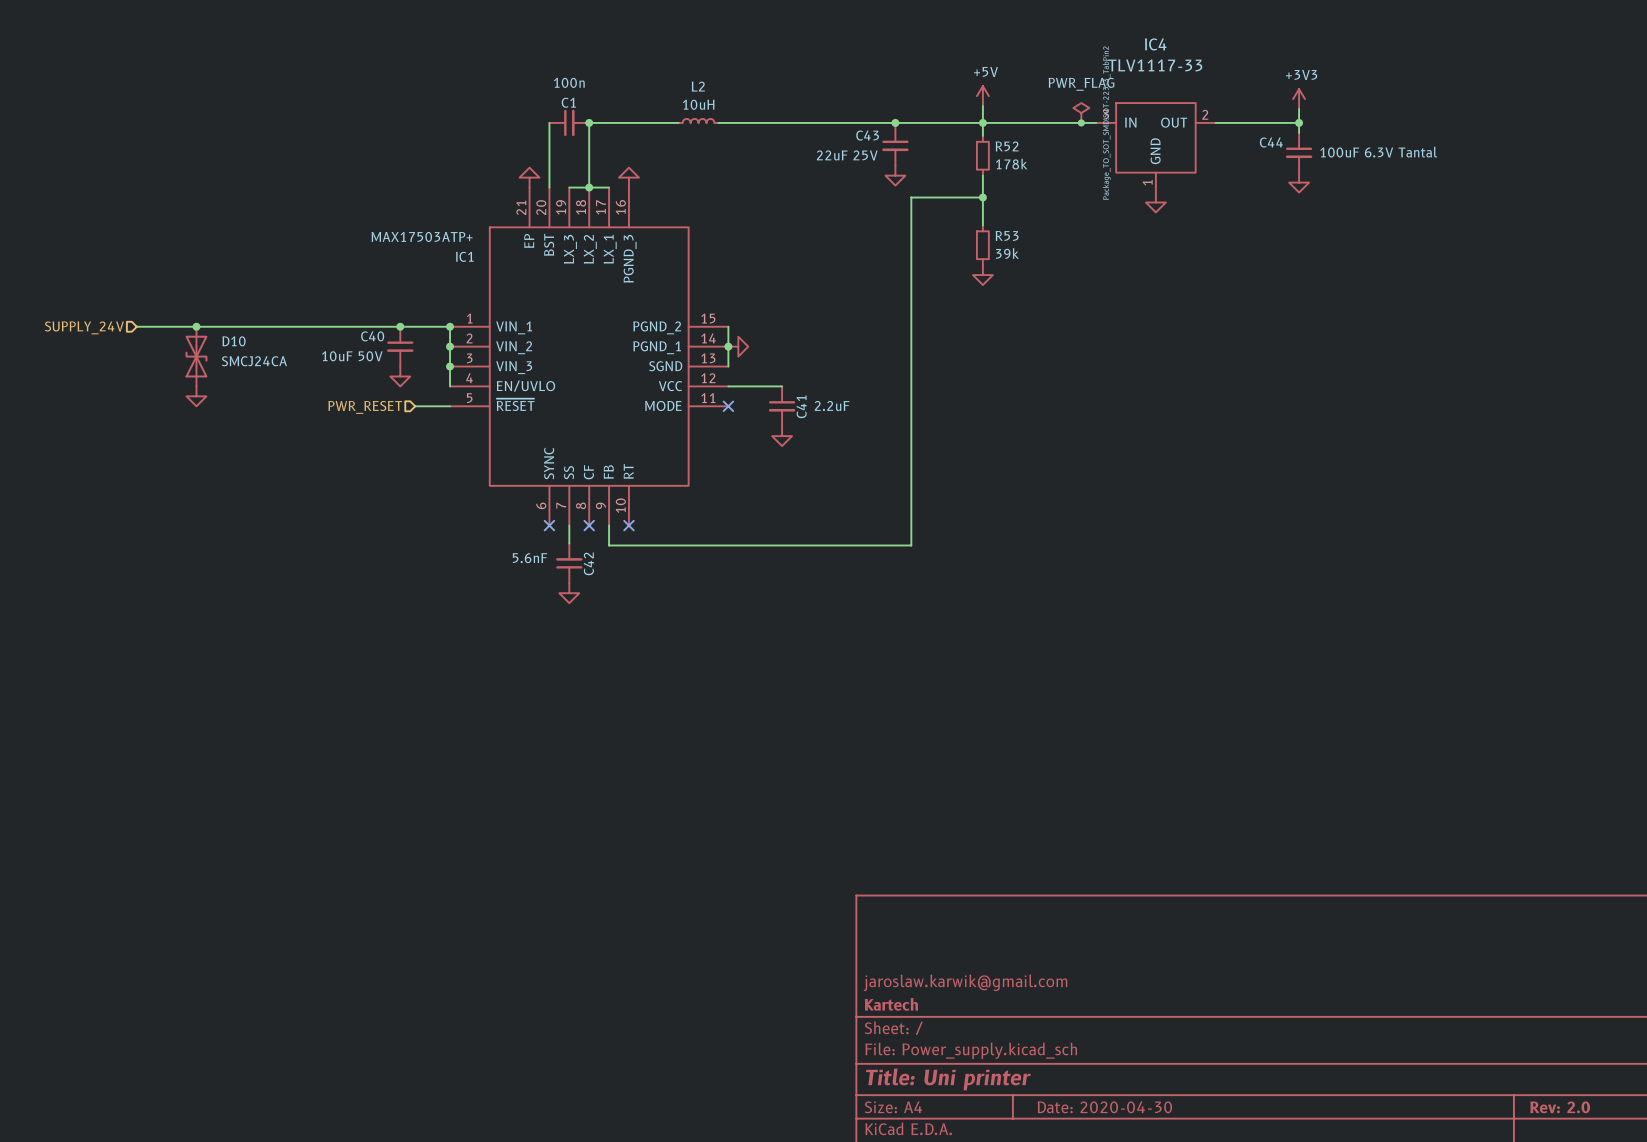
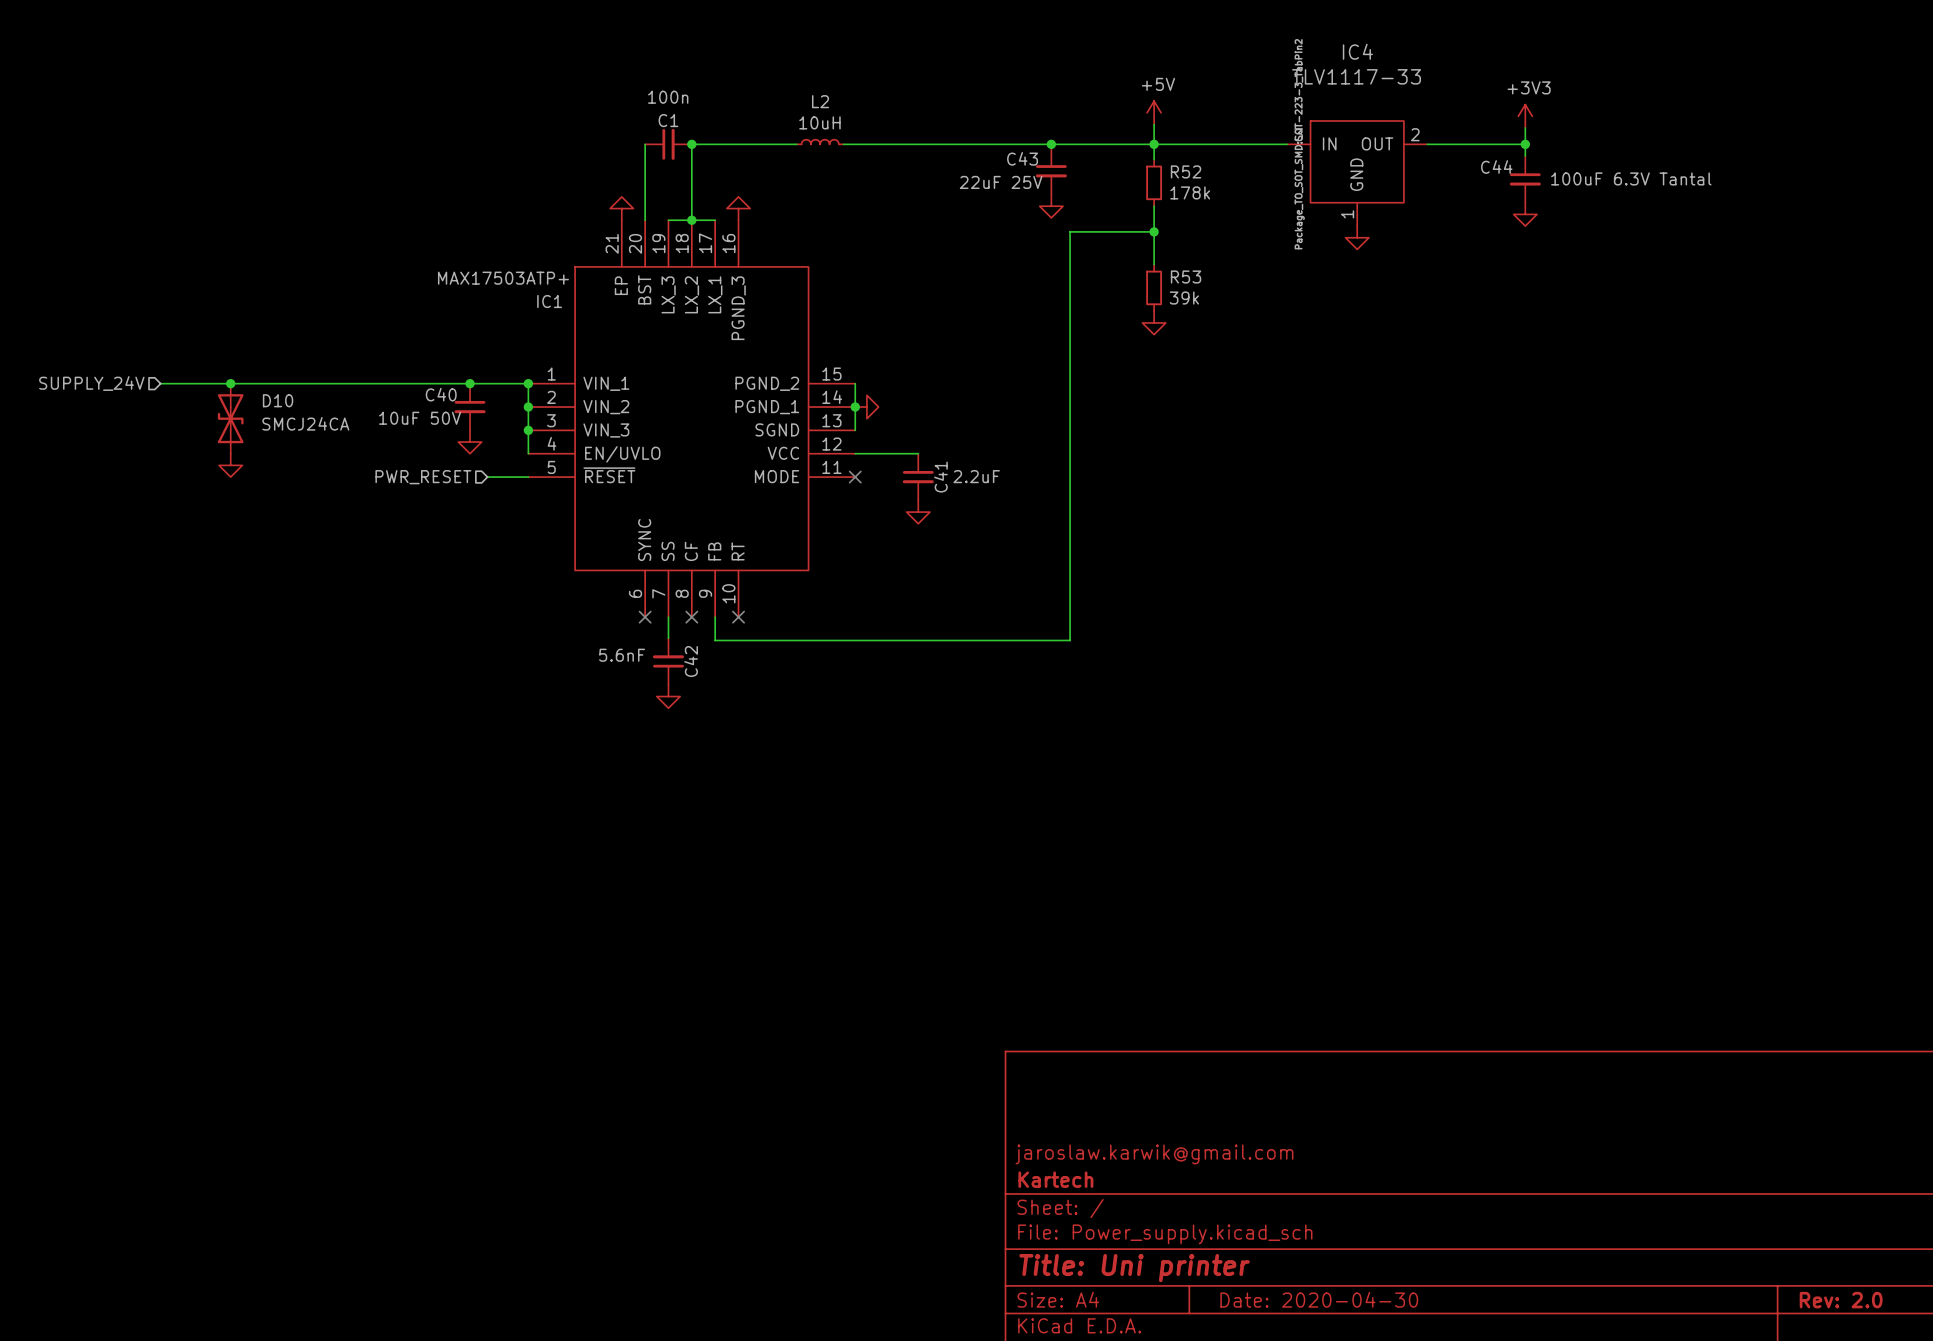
power symbol: PWR_FLAG (1081, 113) -> none
junction: (1081, 122) -> none

